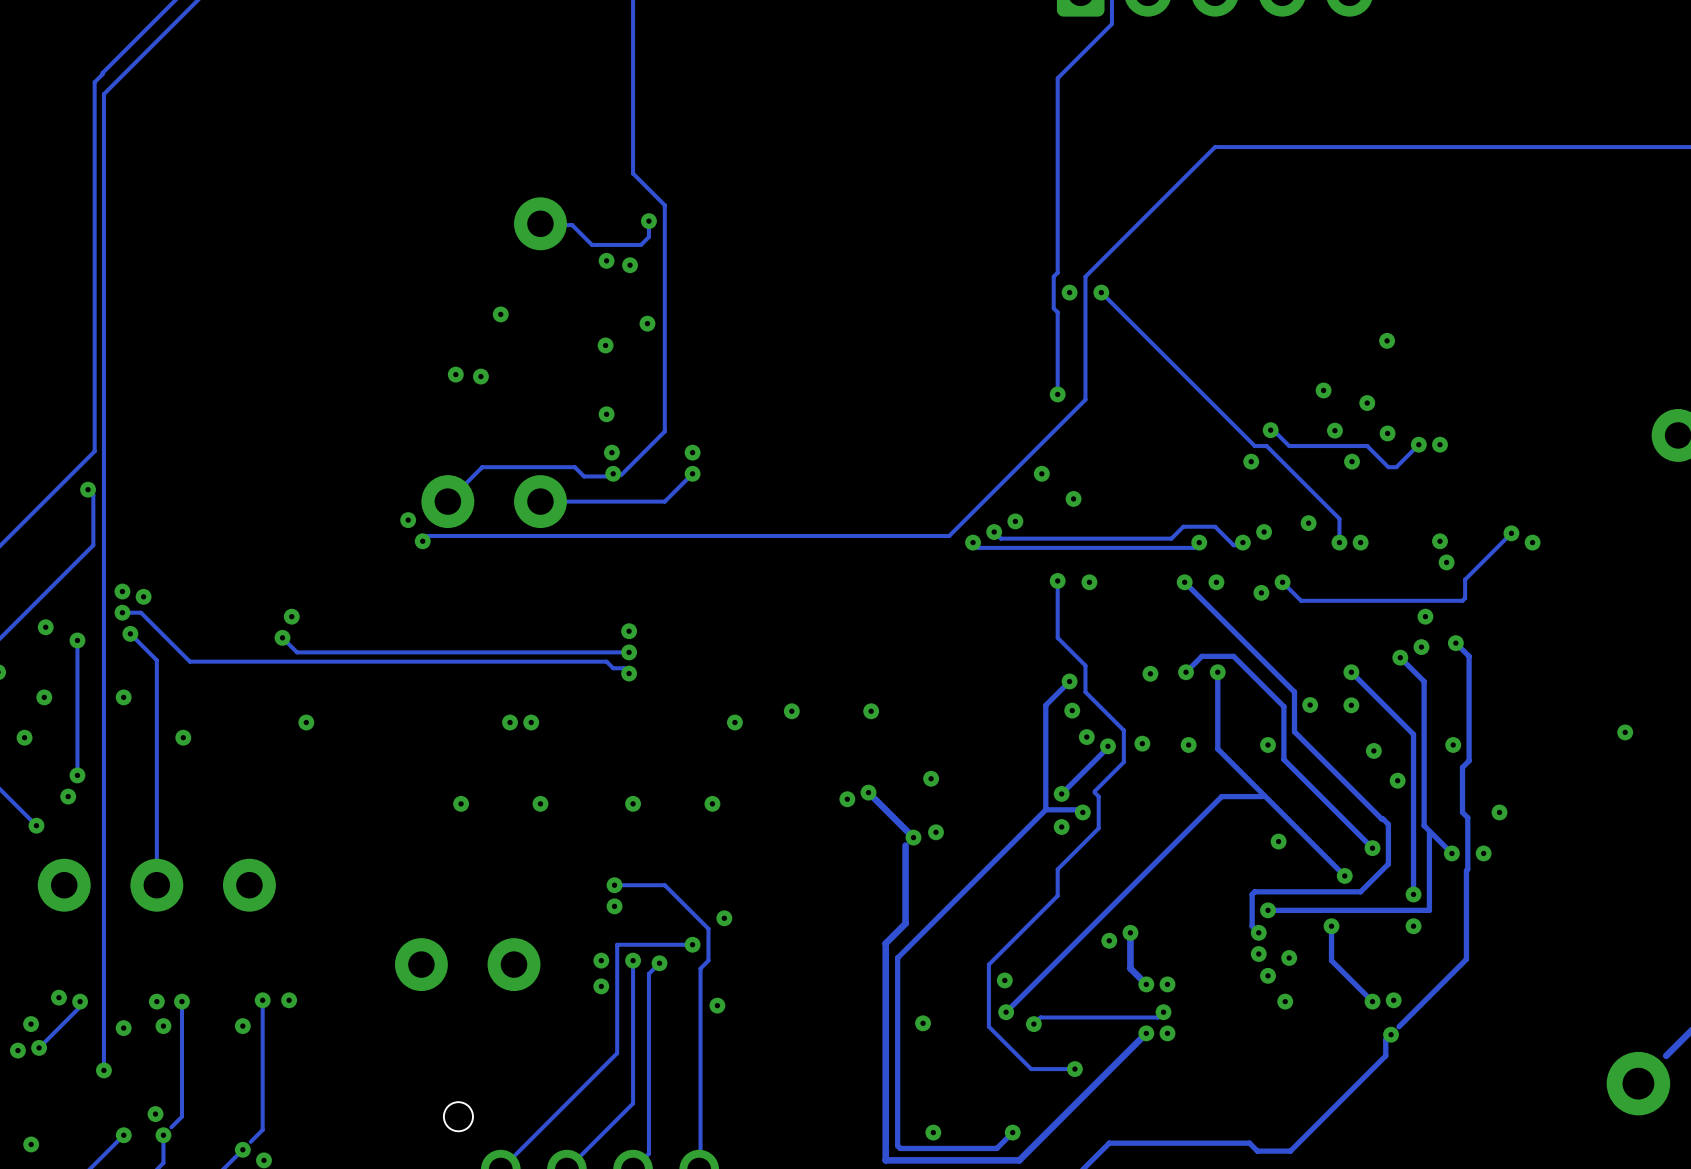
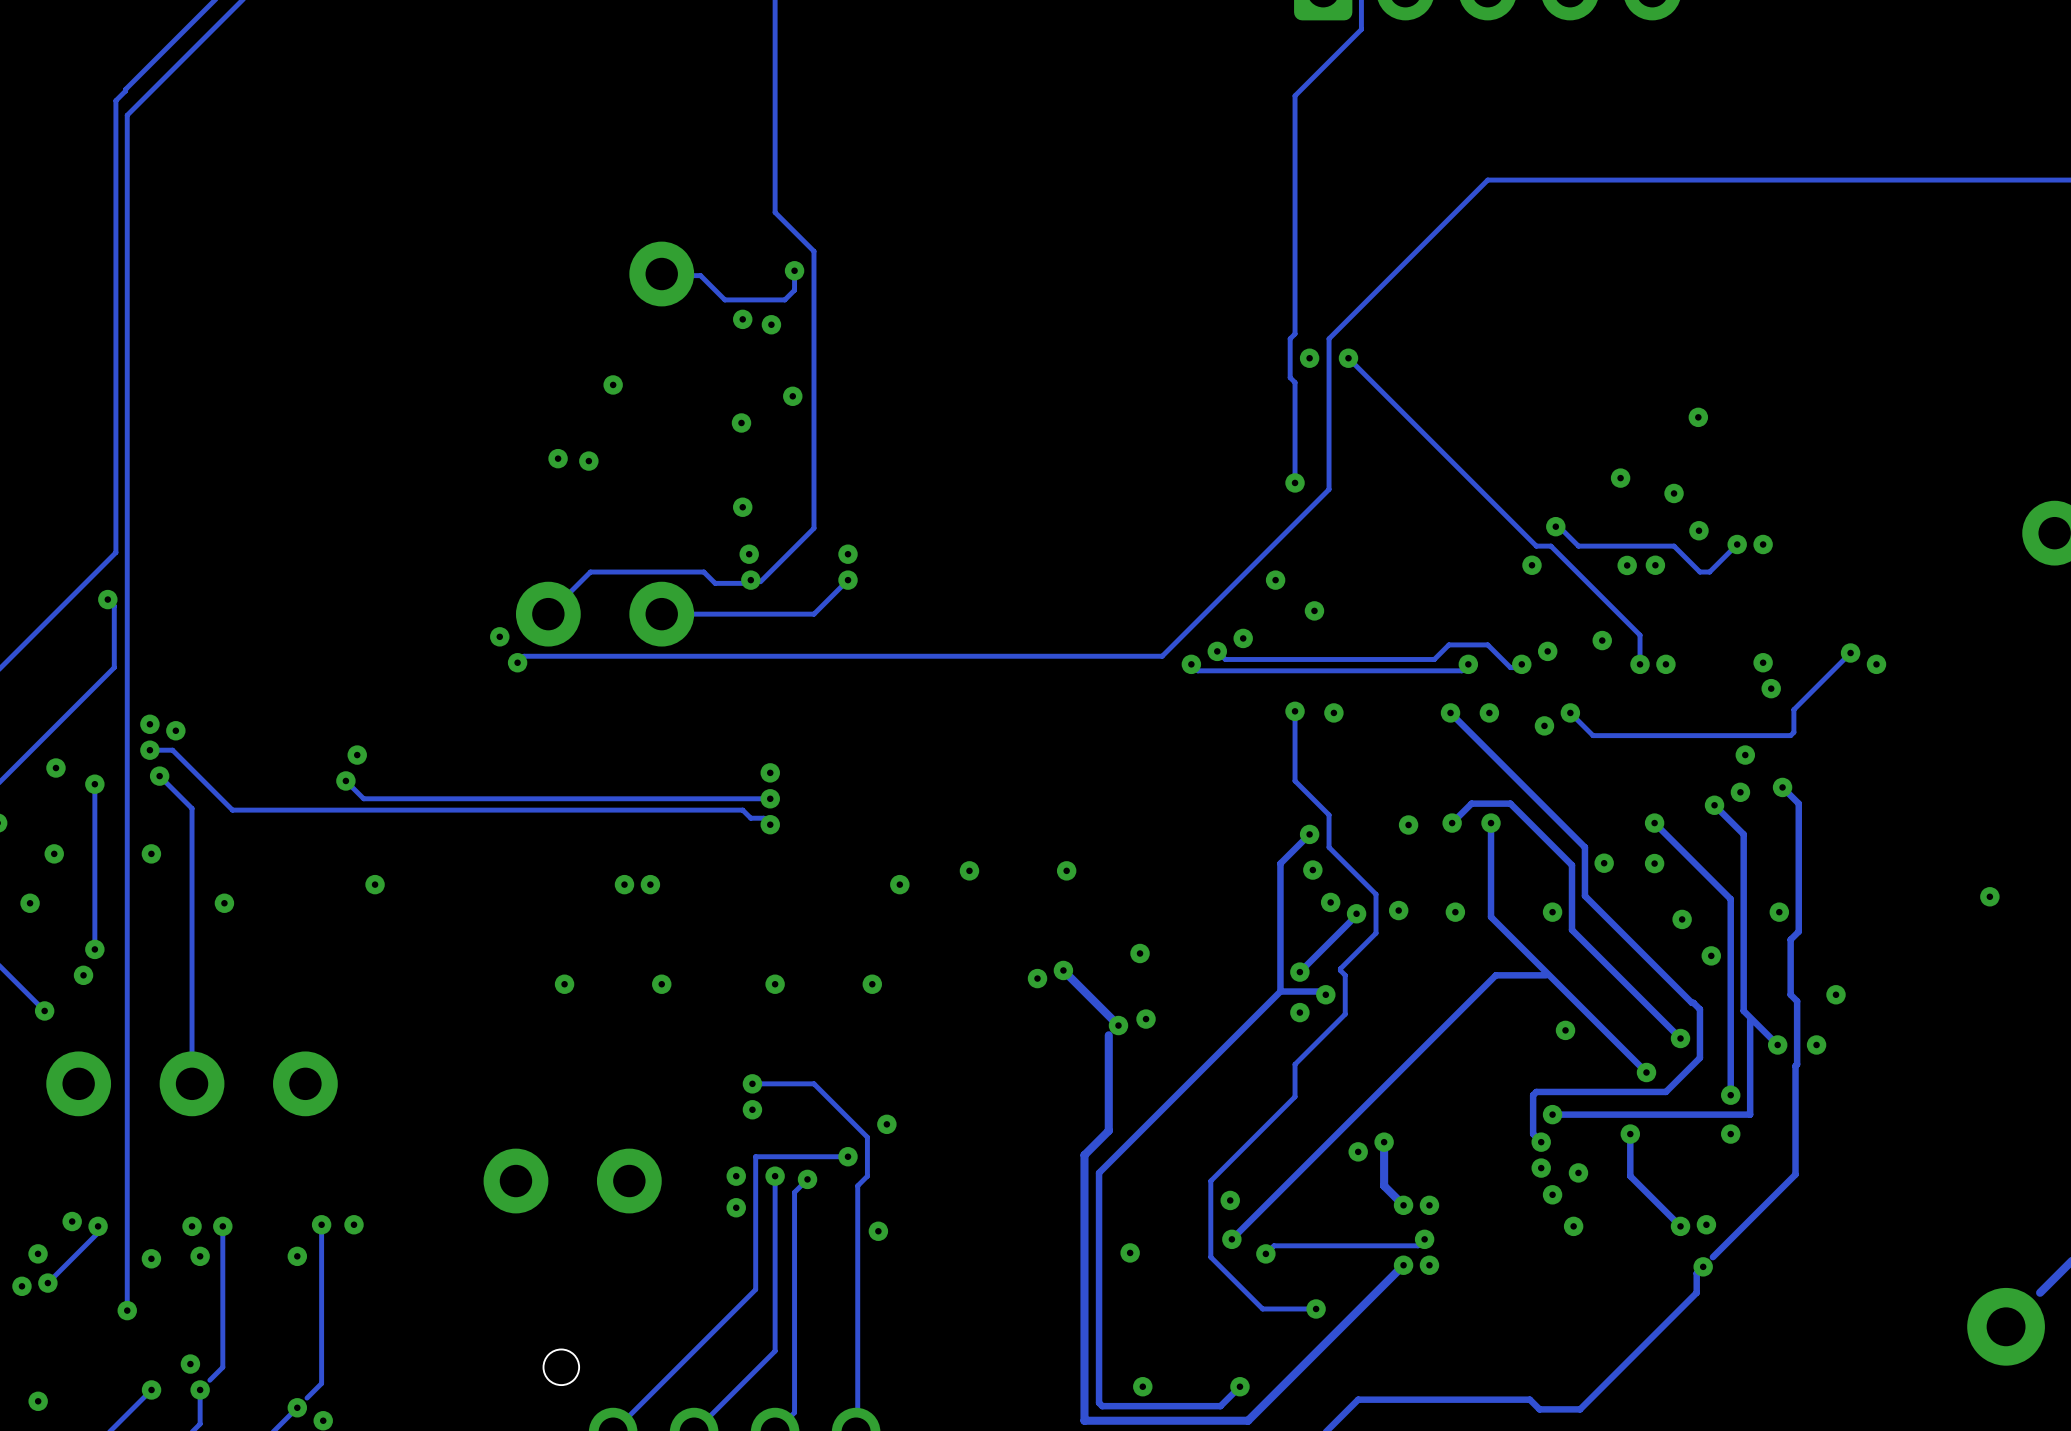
via position: (1334, 430) -> (1627, 565)

